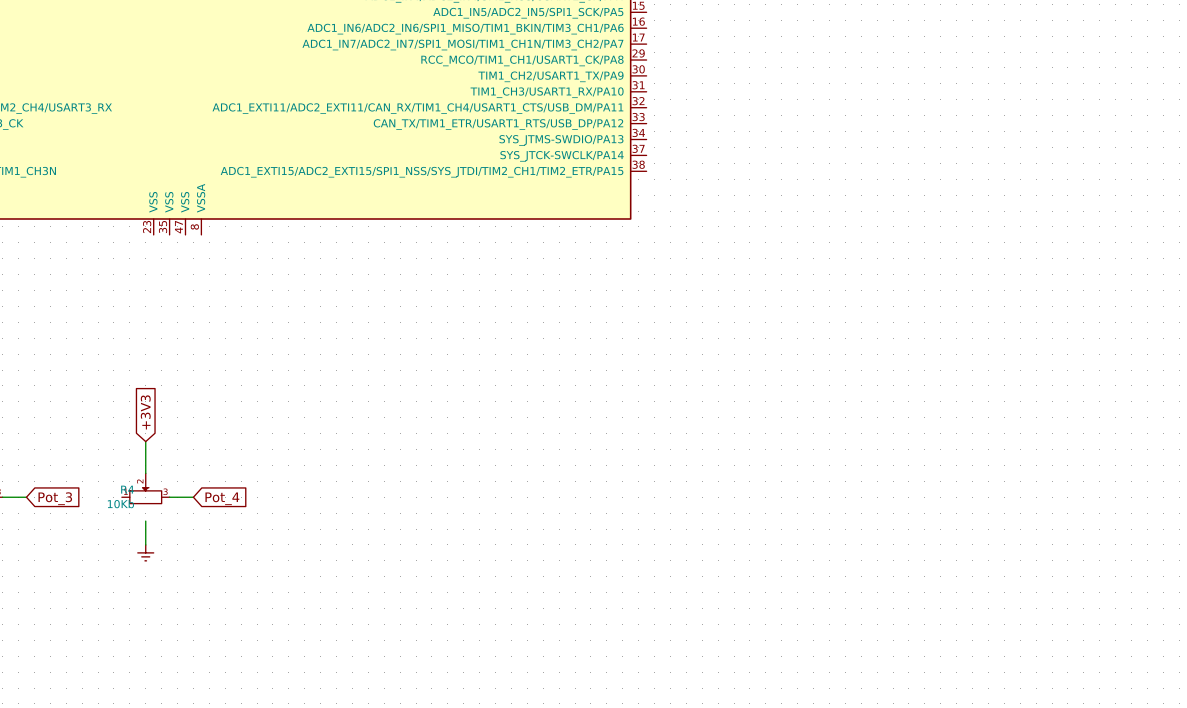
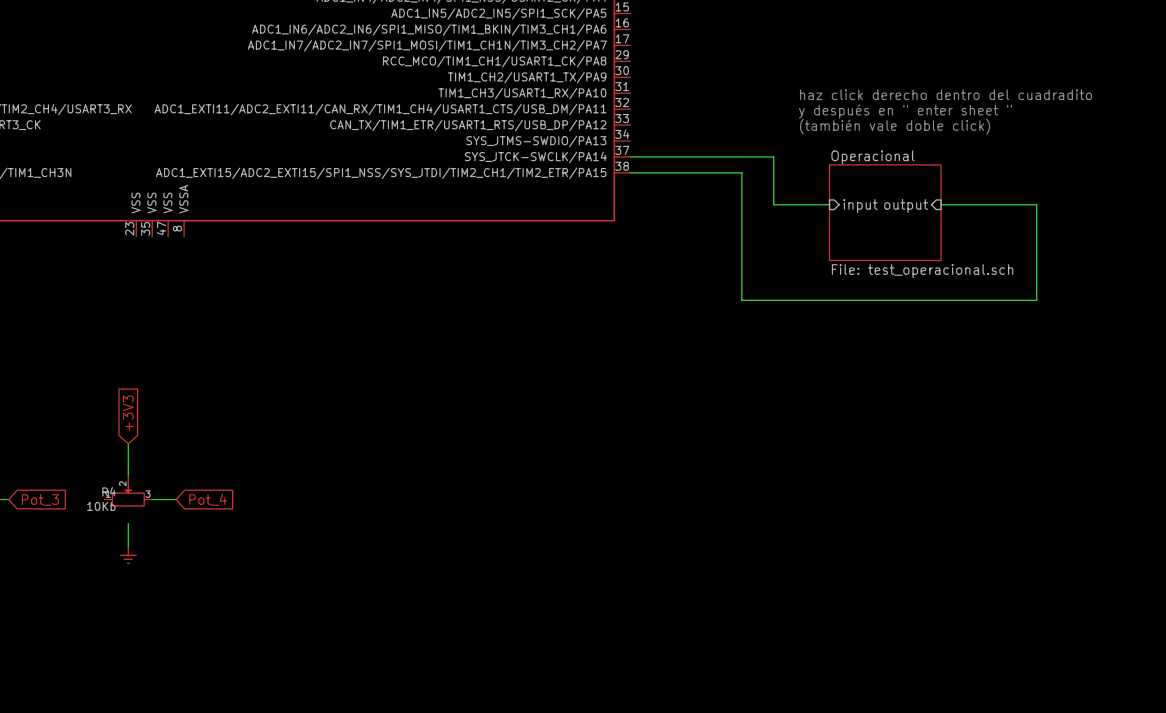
text: none -> haz click derecho dentro del cuadradito (946, 94)
text: none -> y después en " enter sheet " (905, 111)
text: none -> (también vale doble click) (895, 126)
wire: none -> (630, 156) (773, 156) (773, 204) (829, 204)
wire: none -> (630, 172) (741, 172) (741, 300) (1036, 300) (1036, 204) (941, 204)
sheet pin: none -> input (860, 205)
sheet pin: none -> output (906, 205)
sheet Operacional: none -> File: test_operacional.sch (885, 212)

